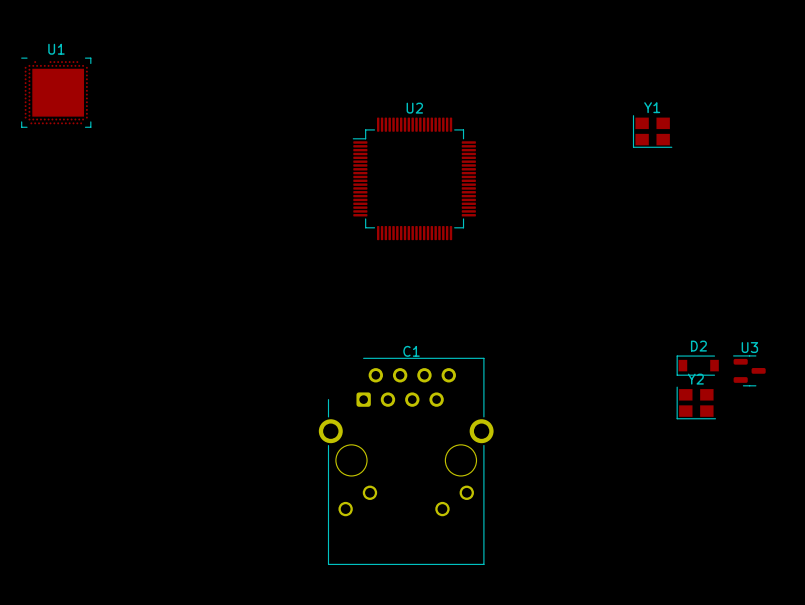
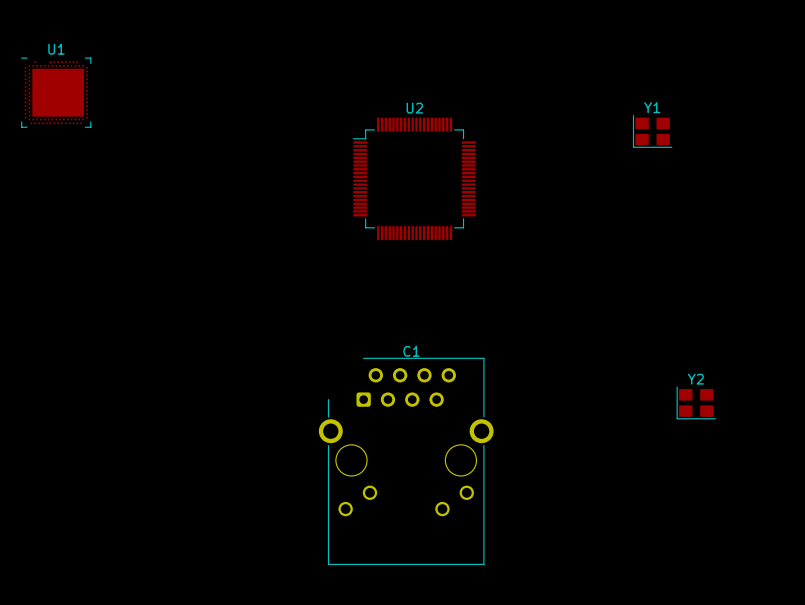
D2: (697, 365) -> none
U3: (749, 370) -> none

